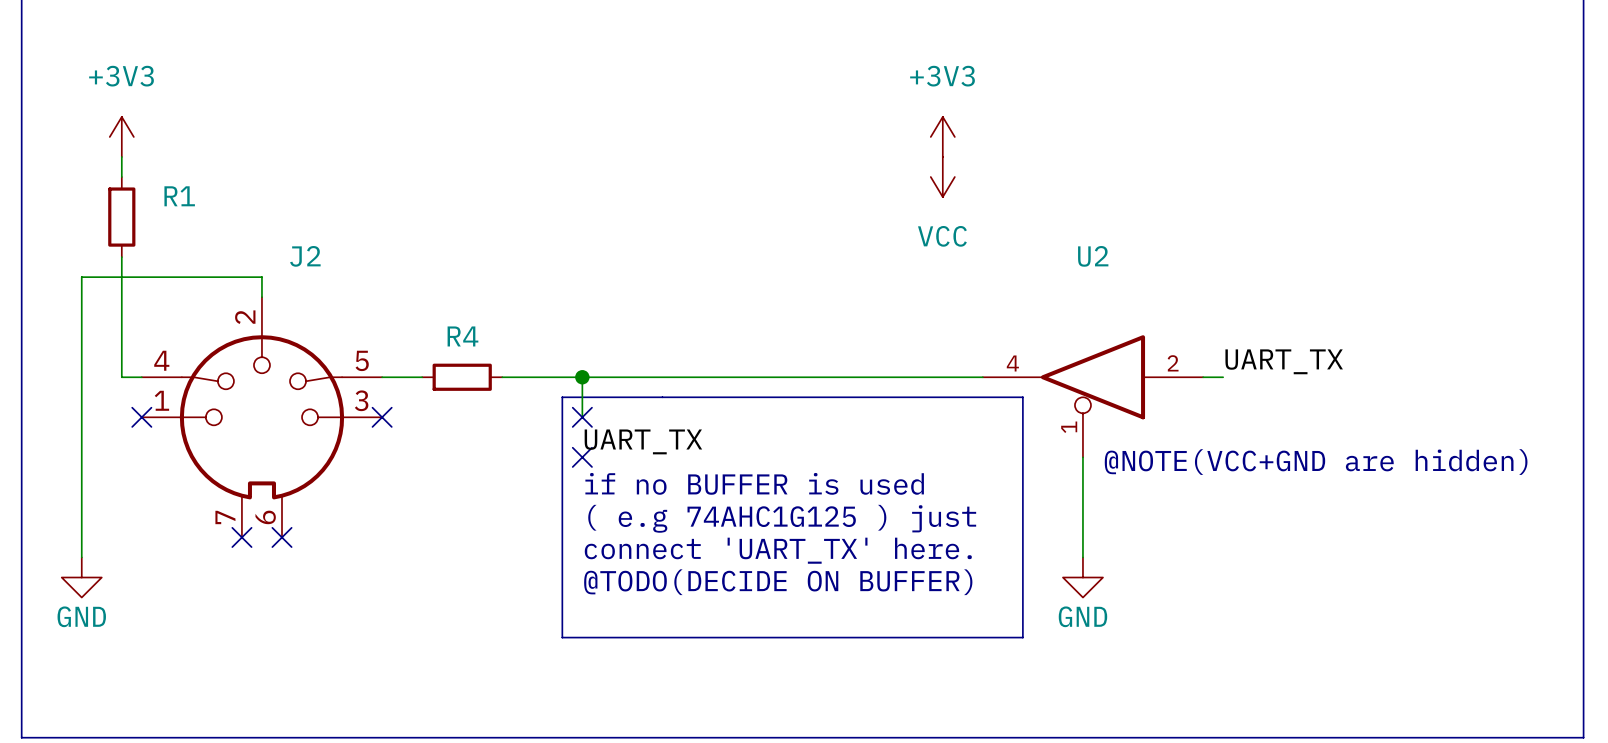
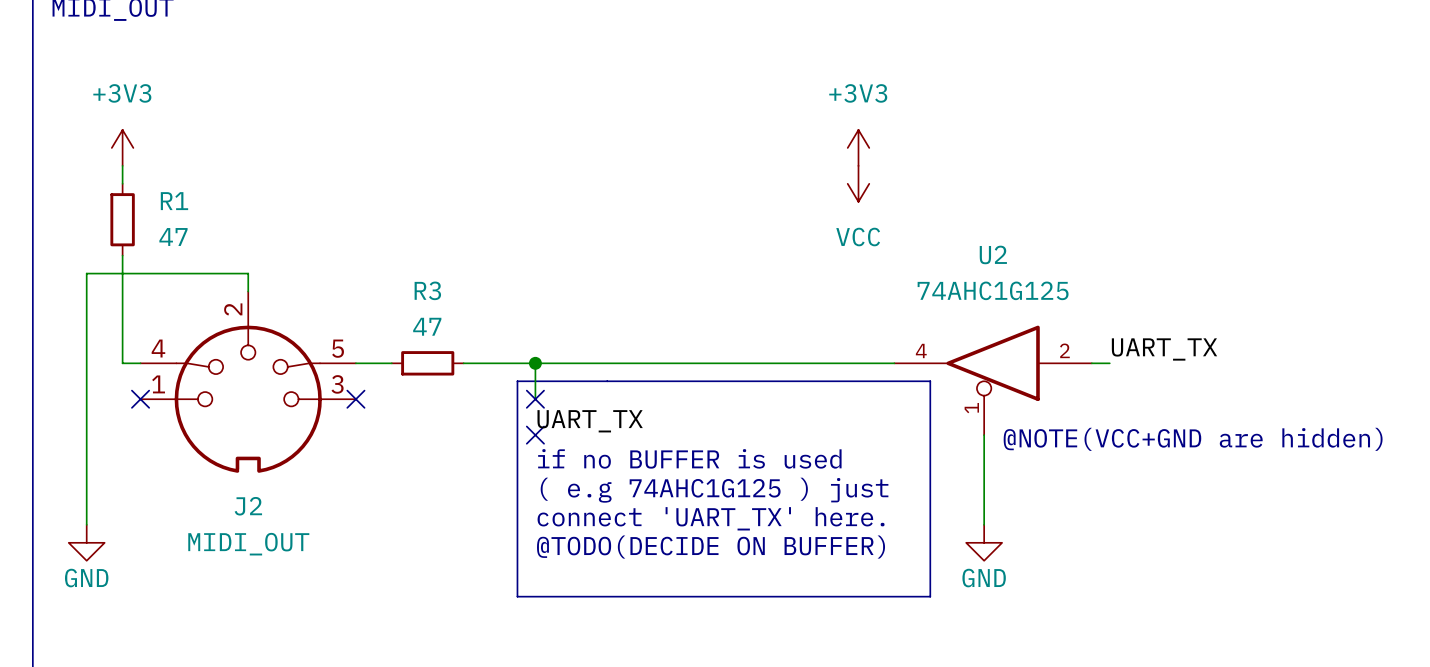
R1 value: none -> 47 (173, 237)
J2 name position: J2 (305, 256) -> J2 (248, 506)
U2 value: none -> 74AHC1G125 (993, 290)
J2 symbol: [141, 297, 383, 538] -> [140, 291, 356, 473]
R4 value: none -> 47 (427, 326)
R4 name: R4 (462, 336) -> R3 (427, 290)
no-connect mark: (241, 537) -> none
no-connect mark: (282, 537) -> none
J2 value: none -> MIDI_OUT (248, 544)

